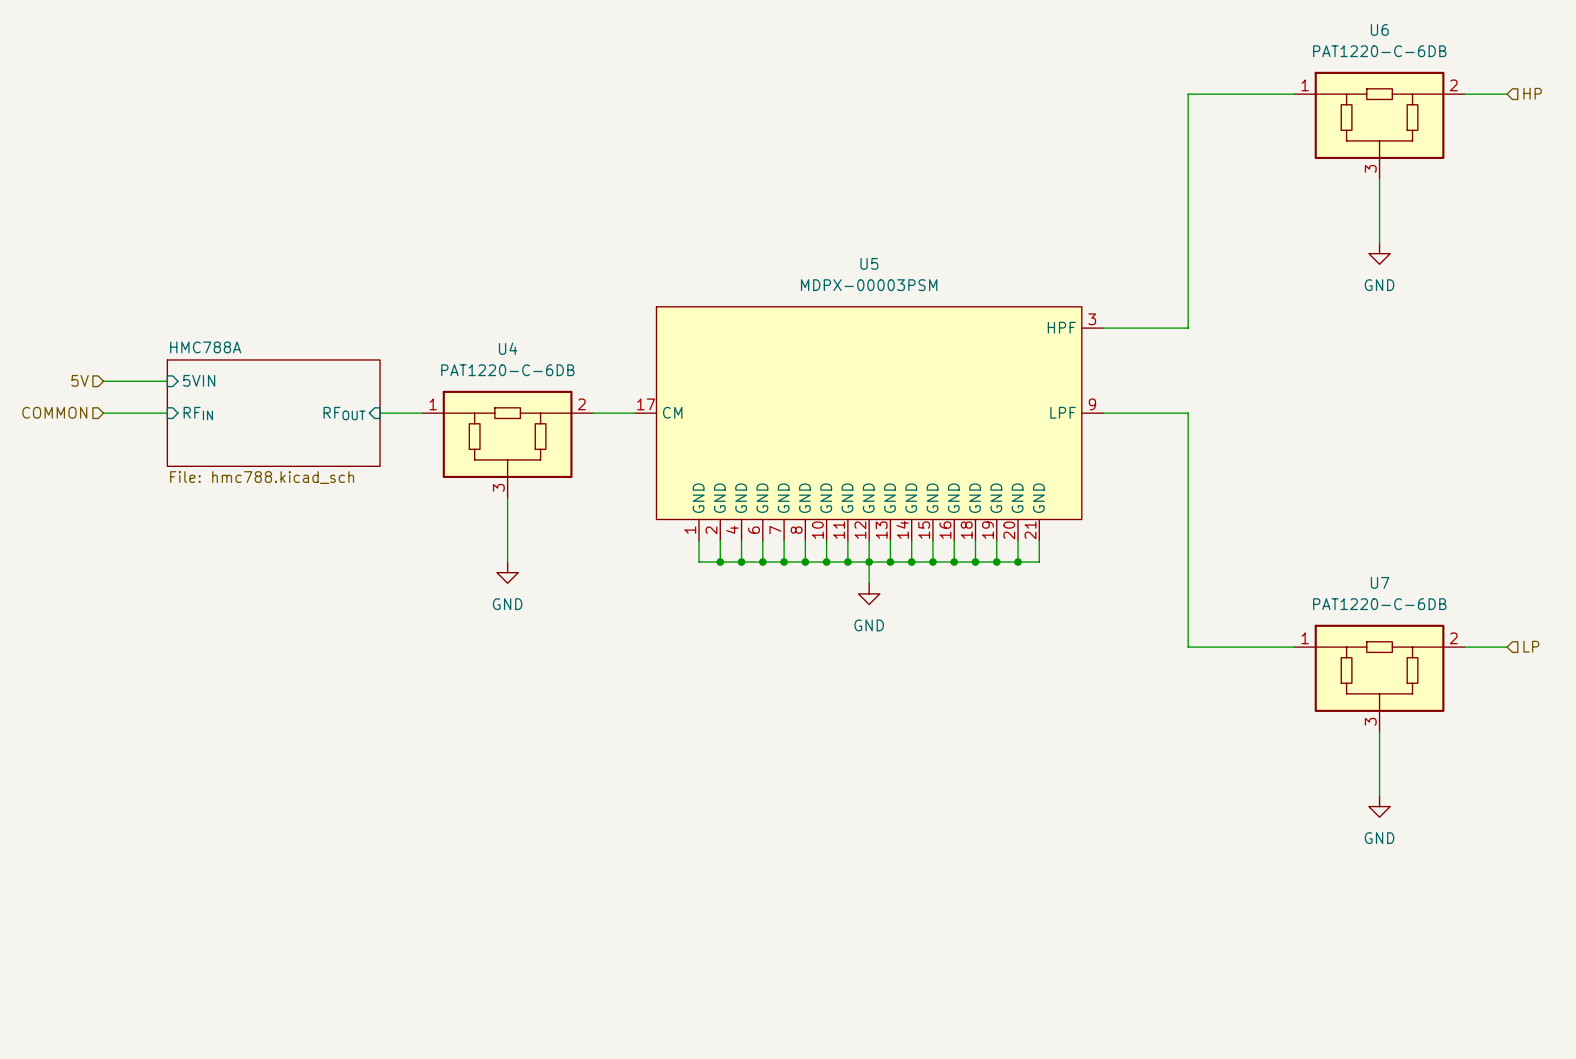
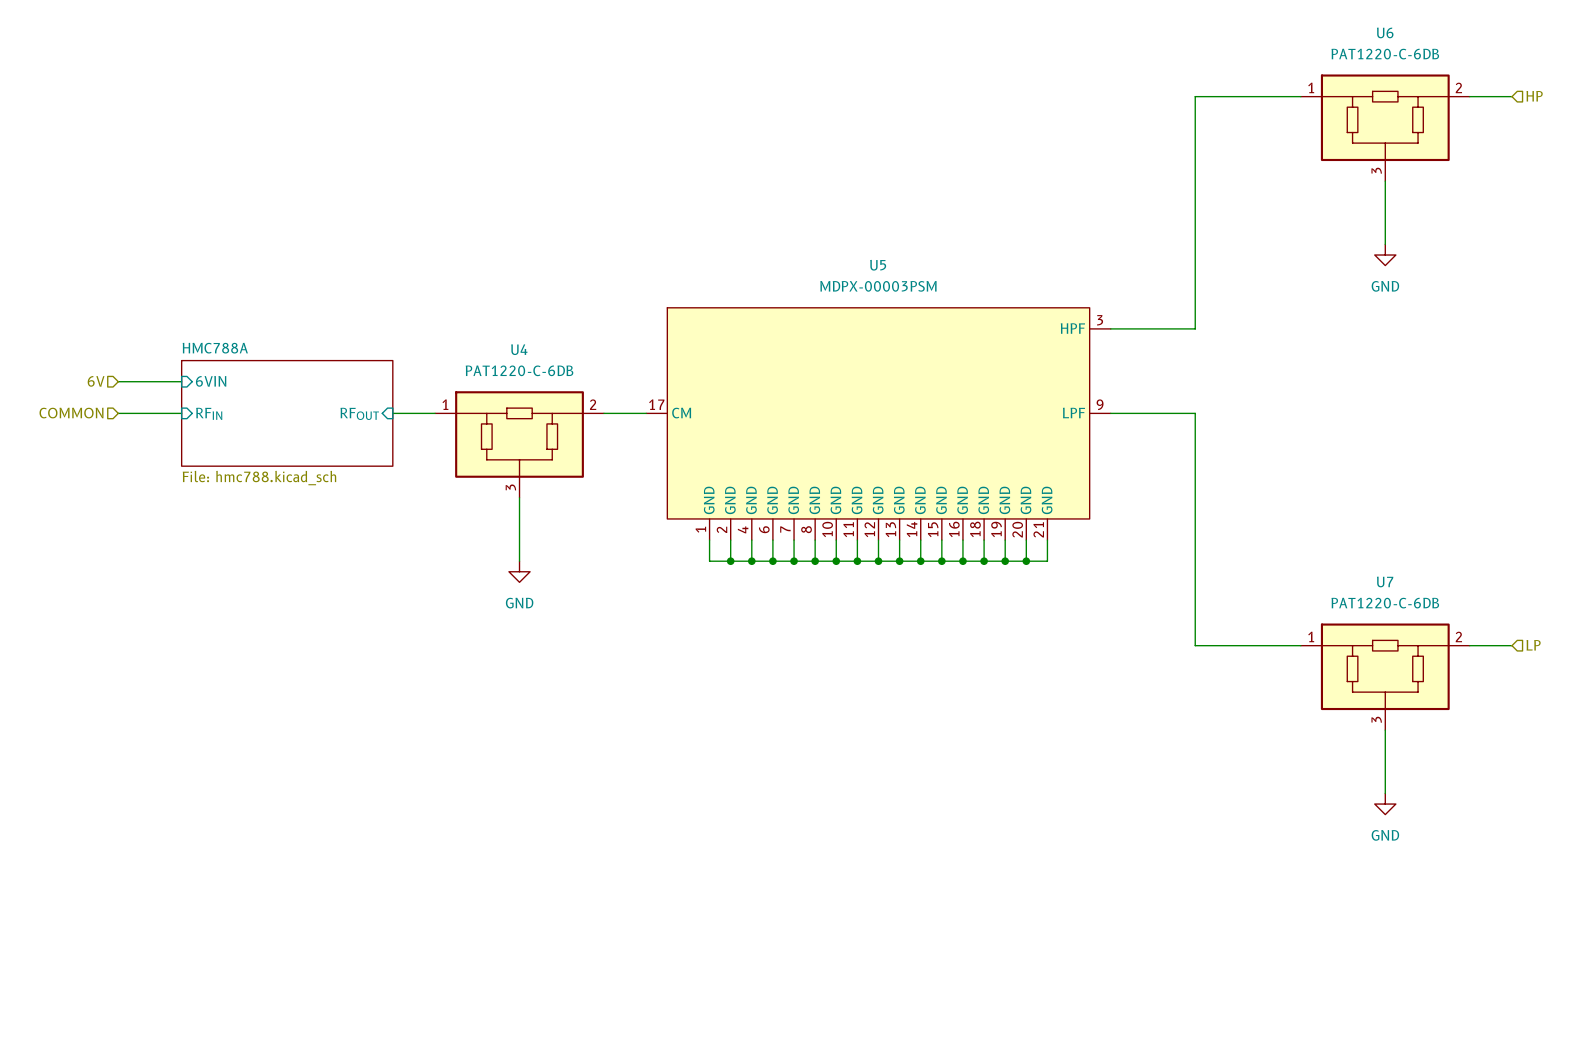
hierarchical label: 5V (80, 380) -> 6V (96, 381)
sheet pin: 5VIN (199, 380) -> 6VIN (211, 381)
wire: (869, 562) (869, 583) -> none
power symbol: GND (869, 593) -> none

